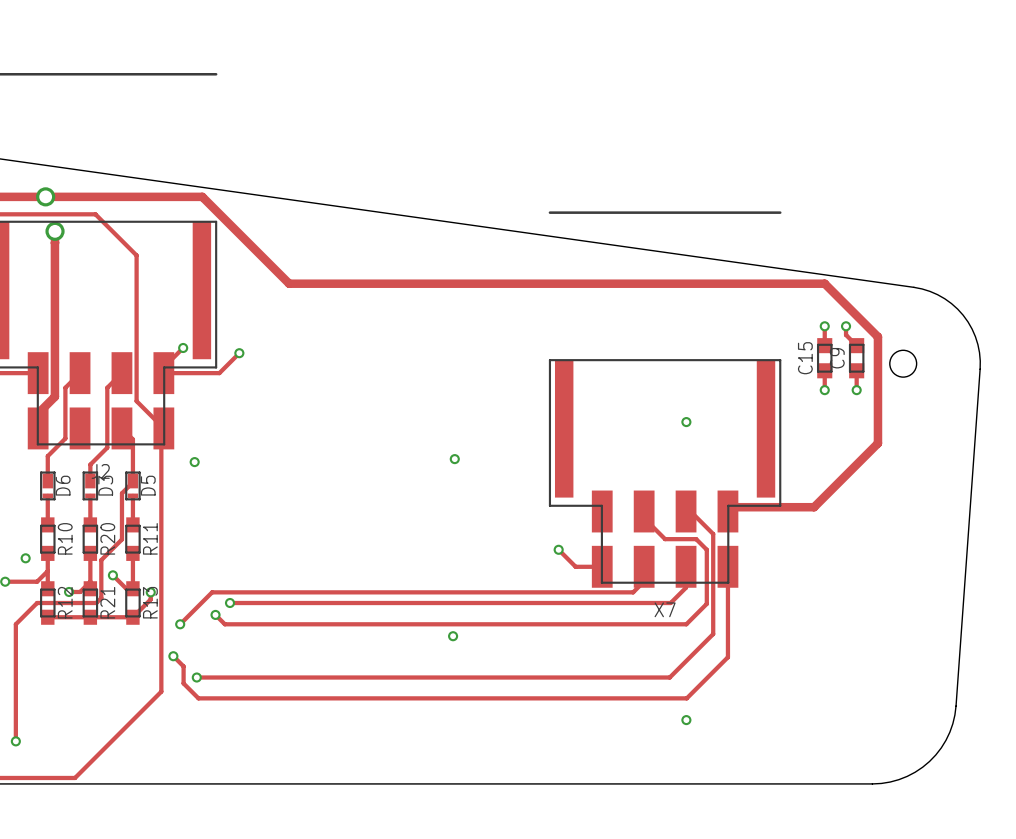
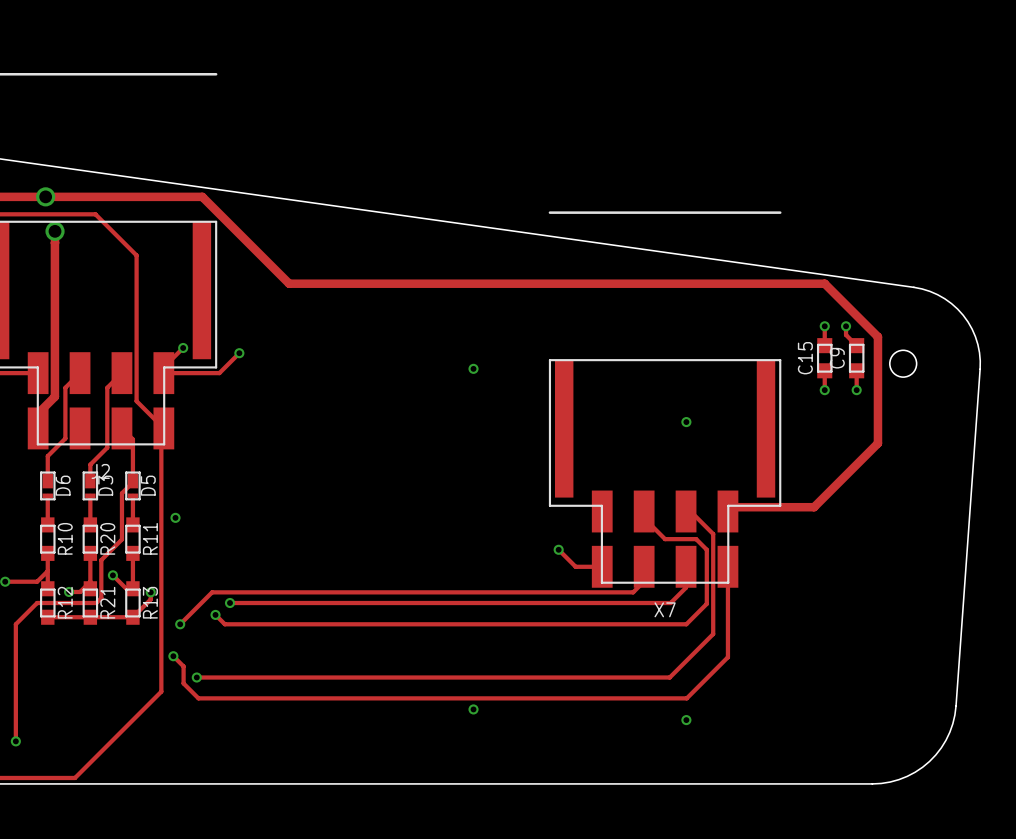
via position: (454, 459) -> (473, 368)
via position: (194, 462) -> (175, 517)
via: (25, 558) -> none
via position: (453, 636) -> (473, 709)

